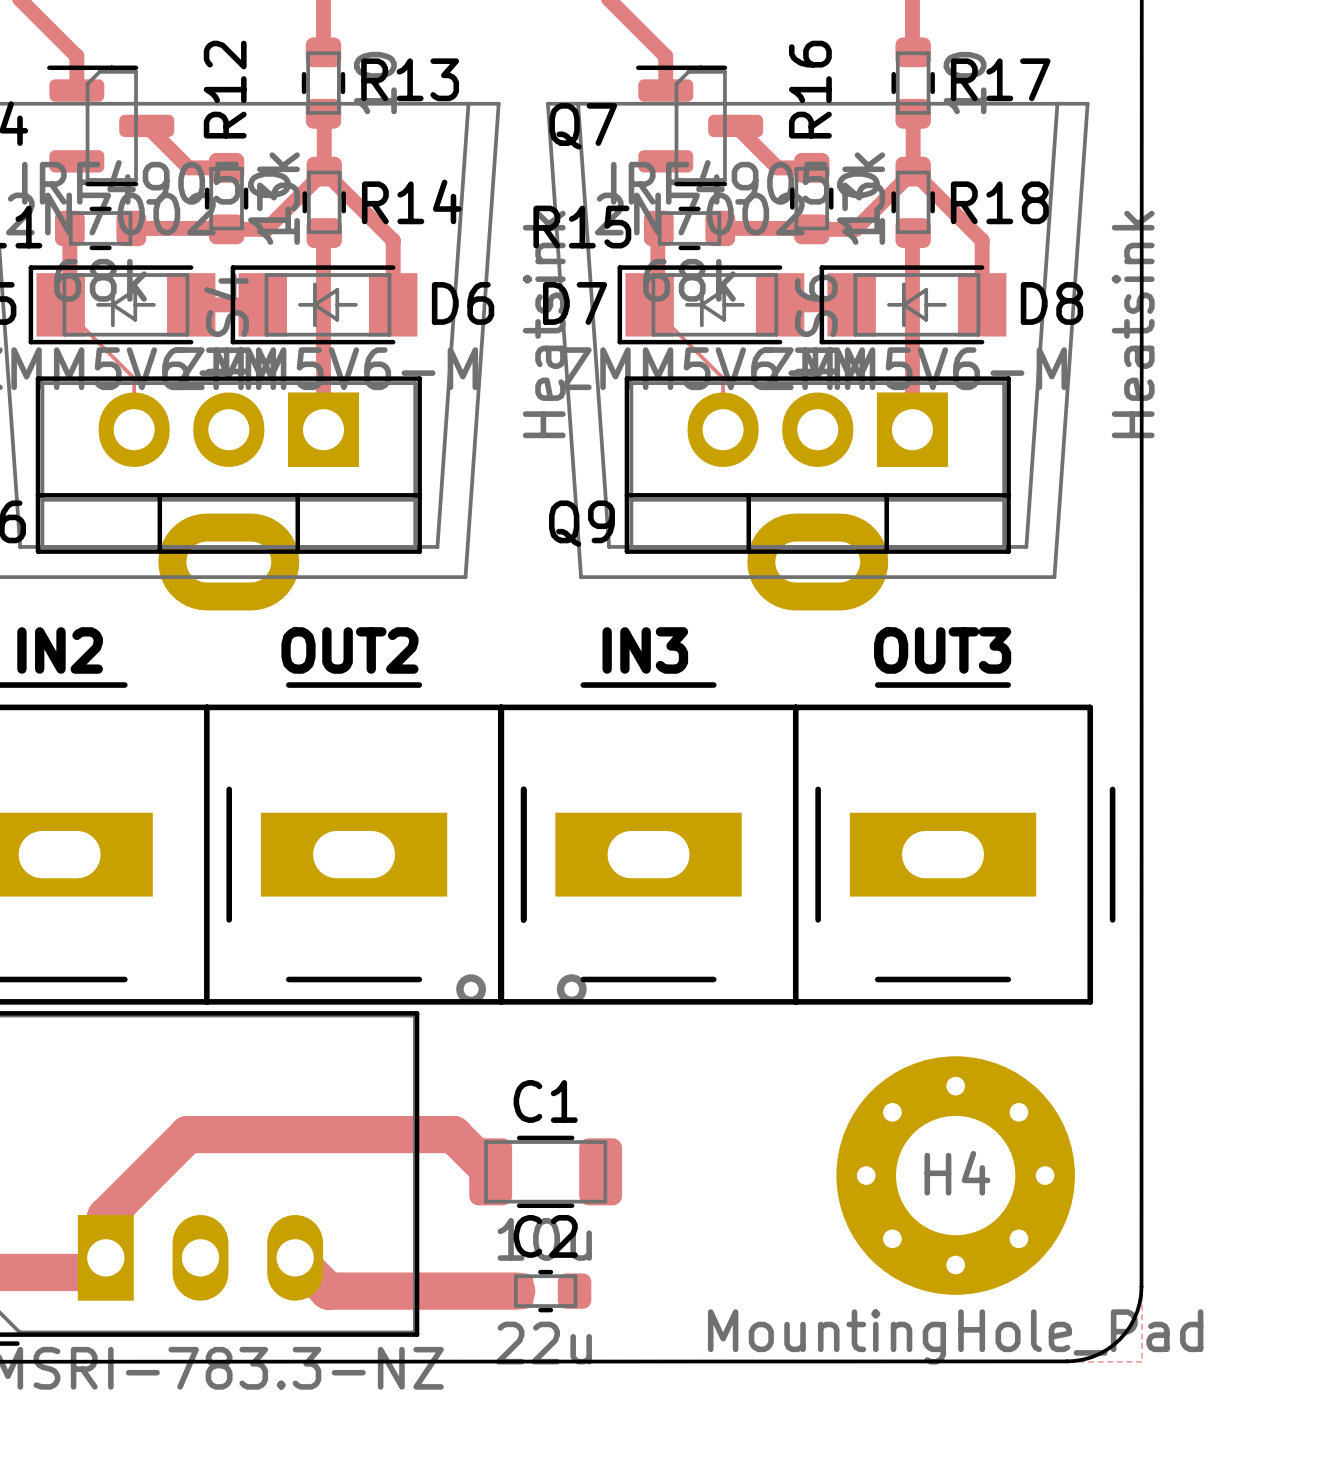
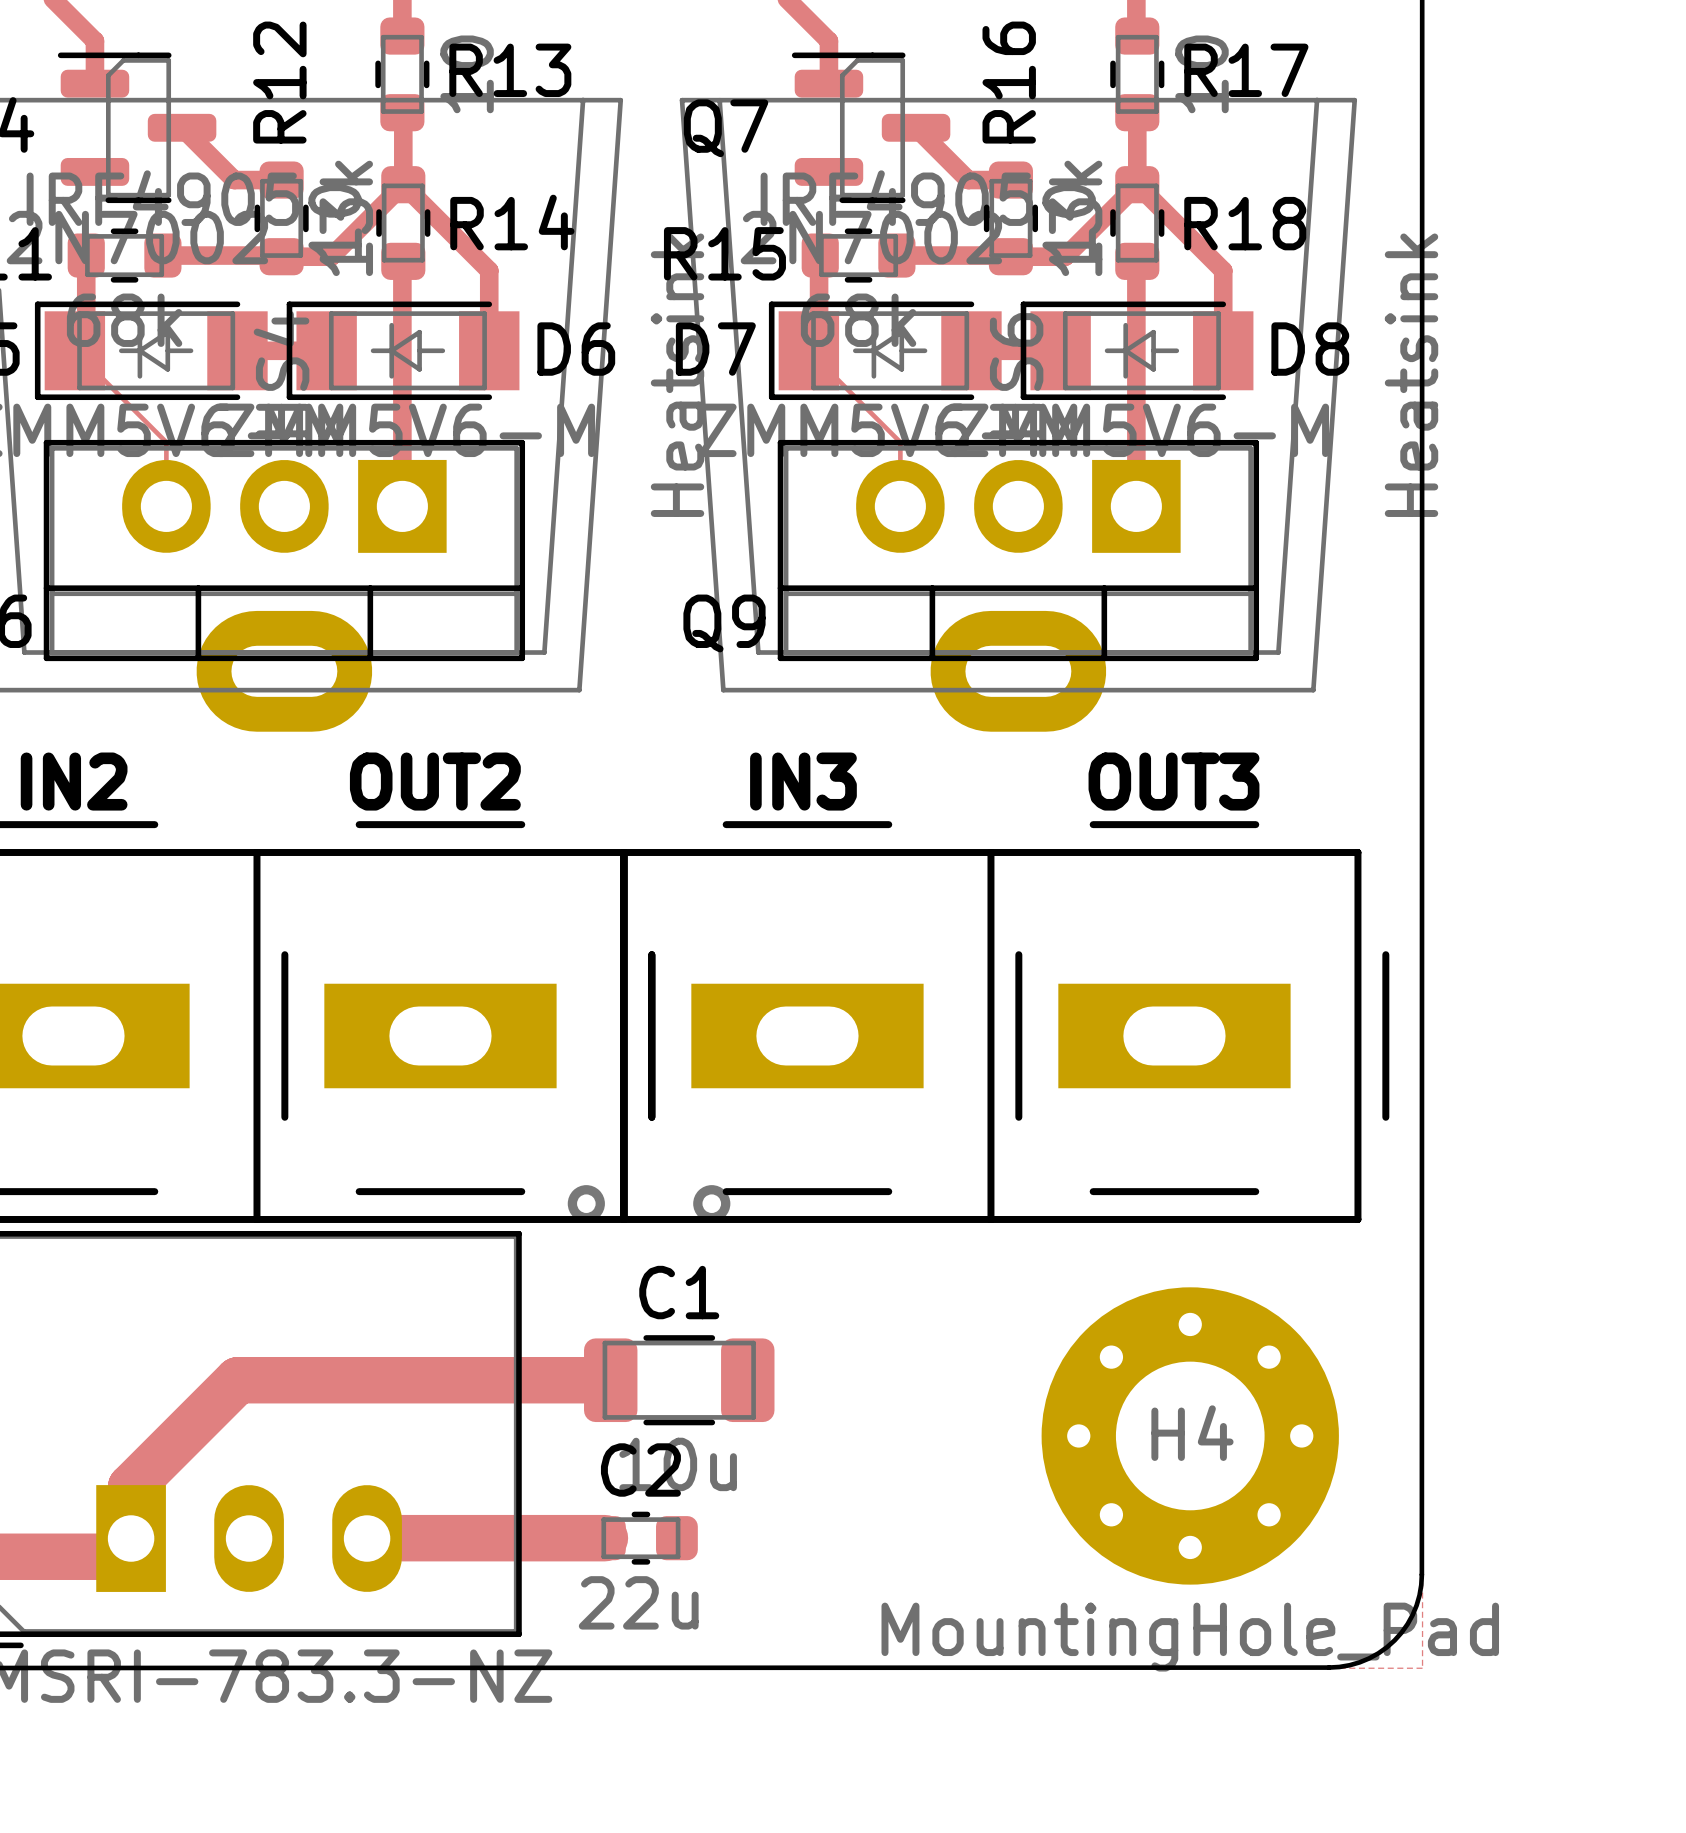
track: (187, 1134) (453, 1134) (490, 1171) -> (233, 1384) (237, 1380) (610, 1380)
C1 position: (545, 1171) -> (679, 1380)
track: (295, 1257) (328, 1291) (516, 1291) -> (367, 1538) (604, 1538)
C2 position: (545, 1291) -> (640, 1538)

